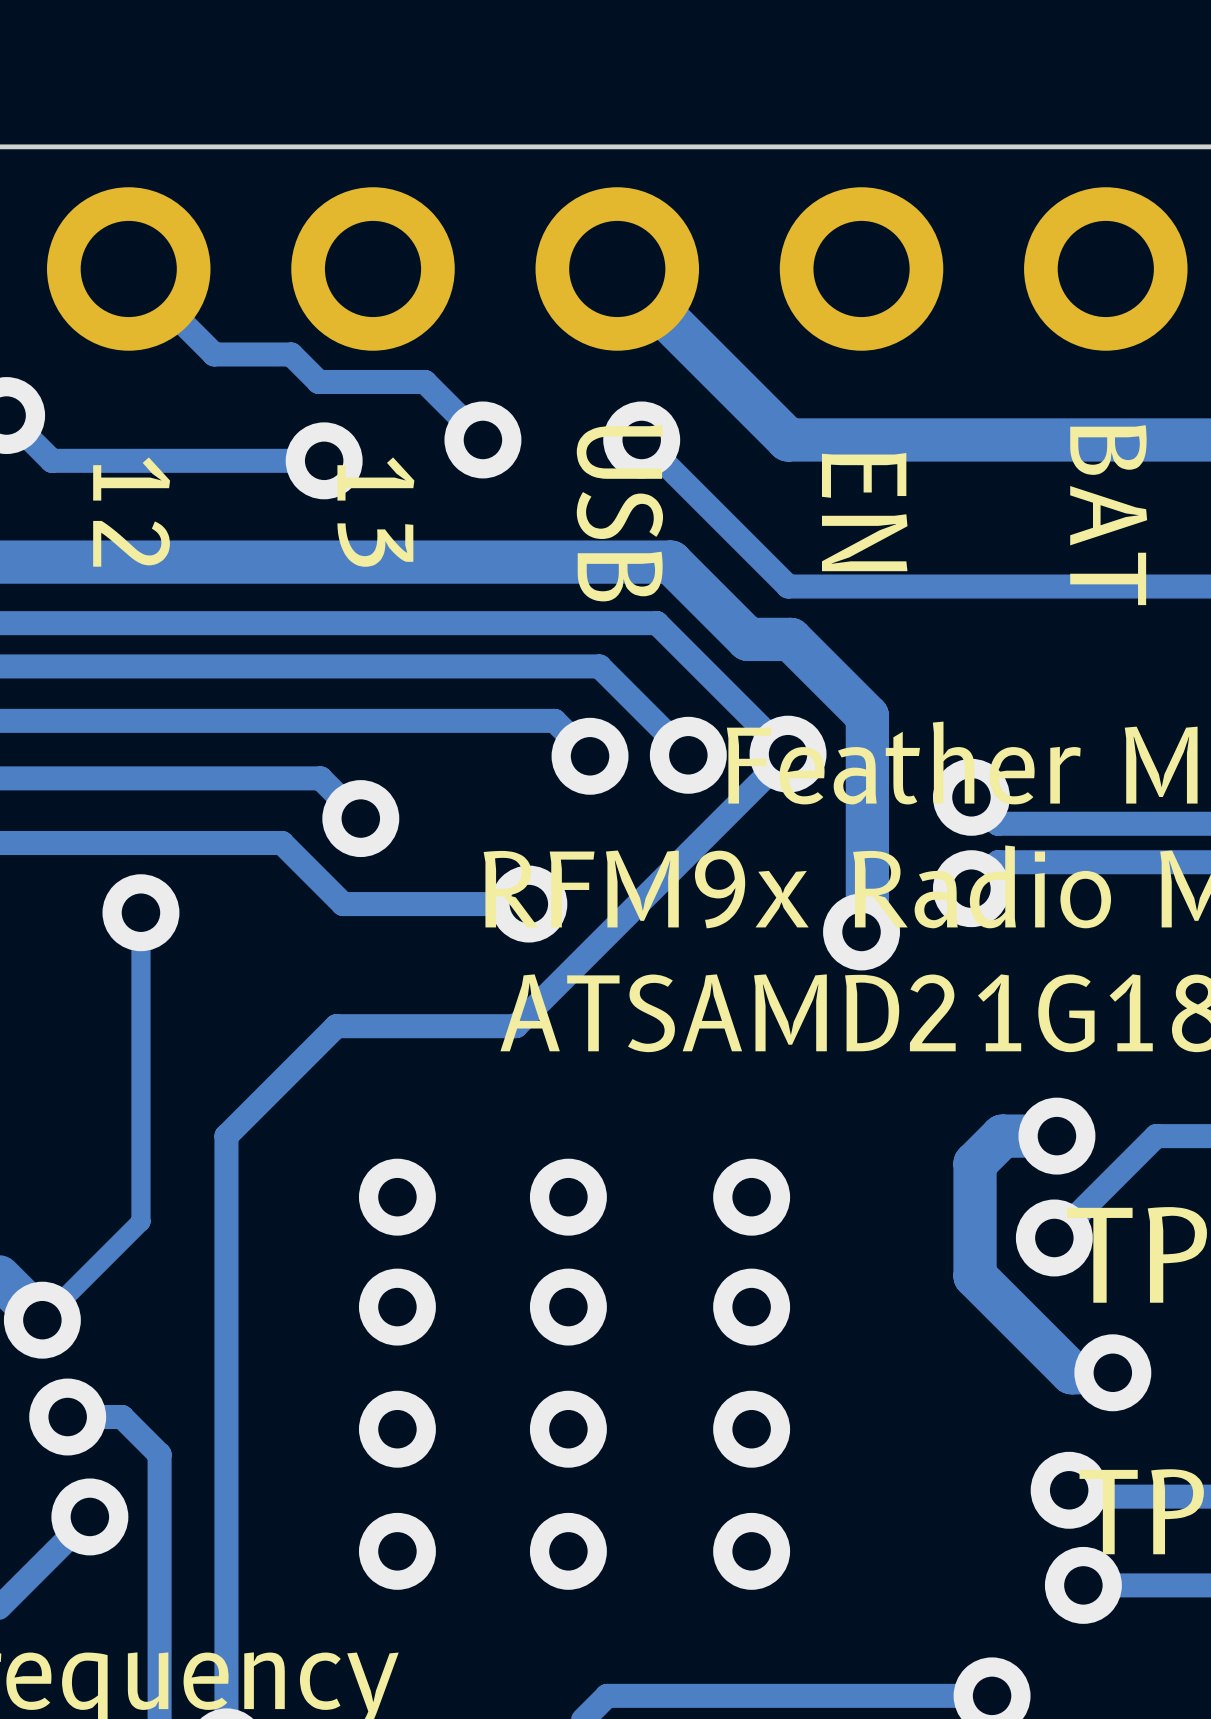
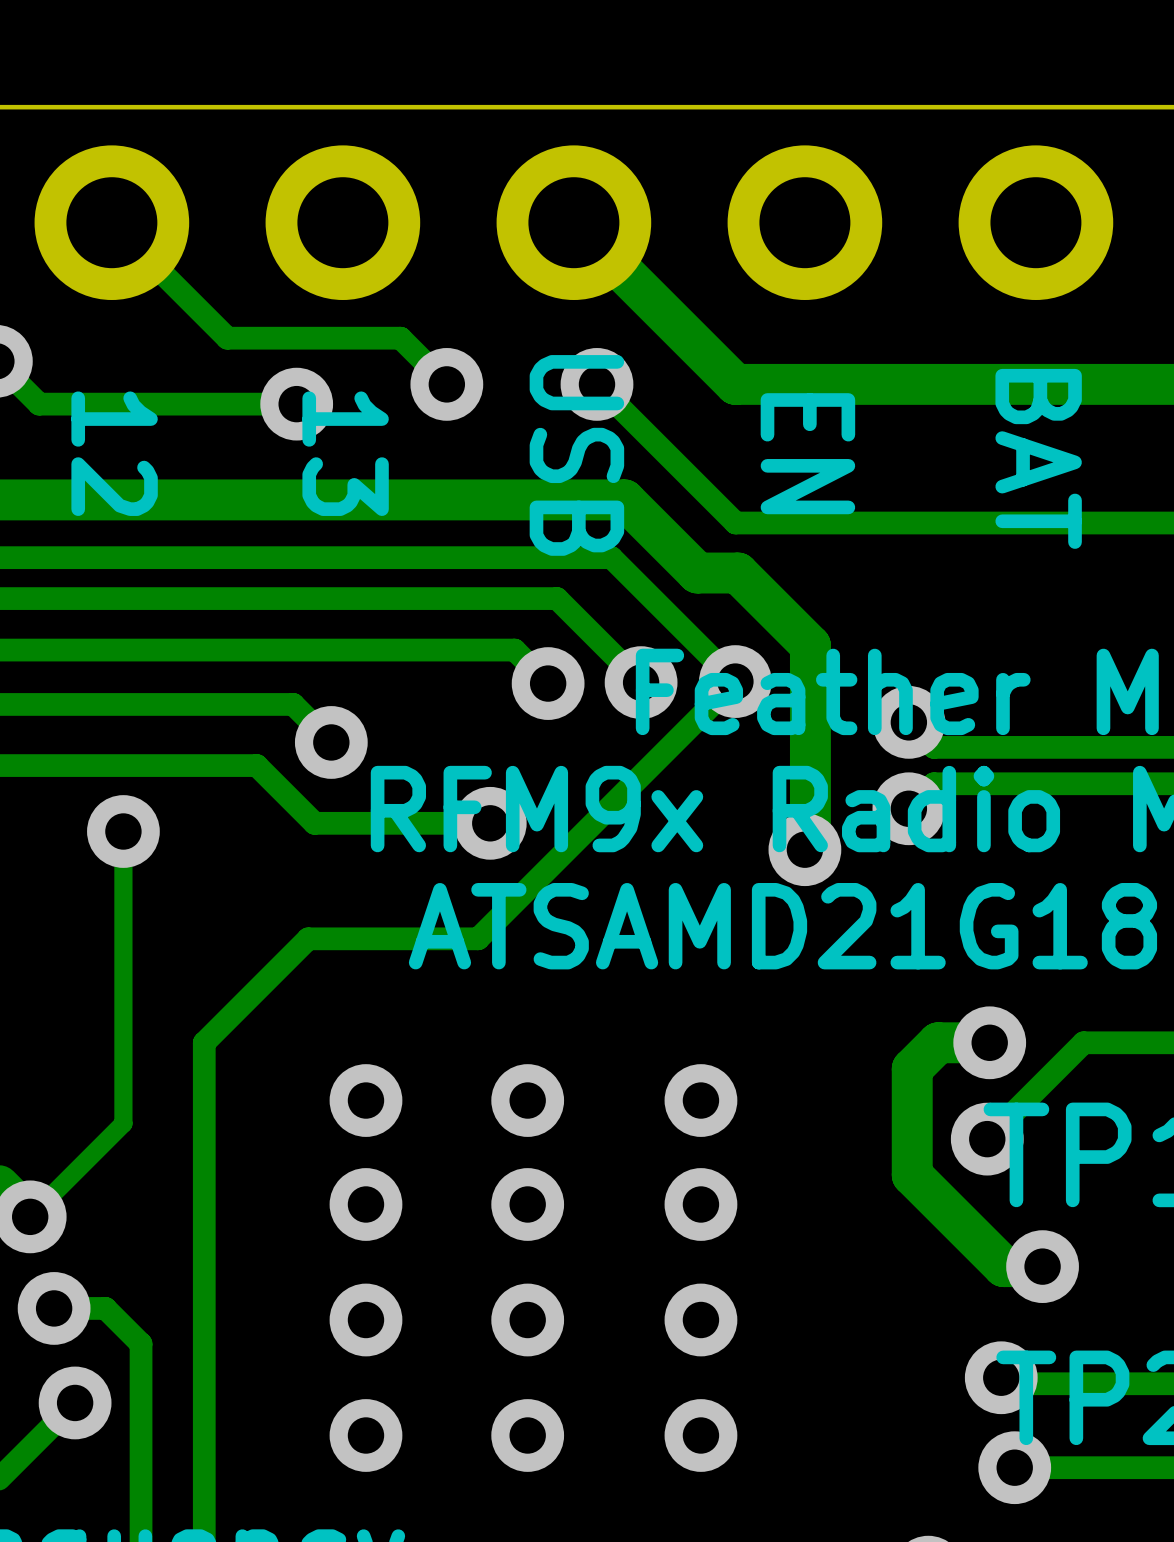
track: (214, 354) (291, 354) (318, 381) (424, 381) (434, 391) -> (192, 303) (227, 338) (400, 338)

